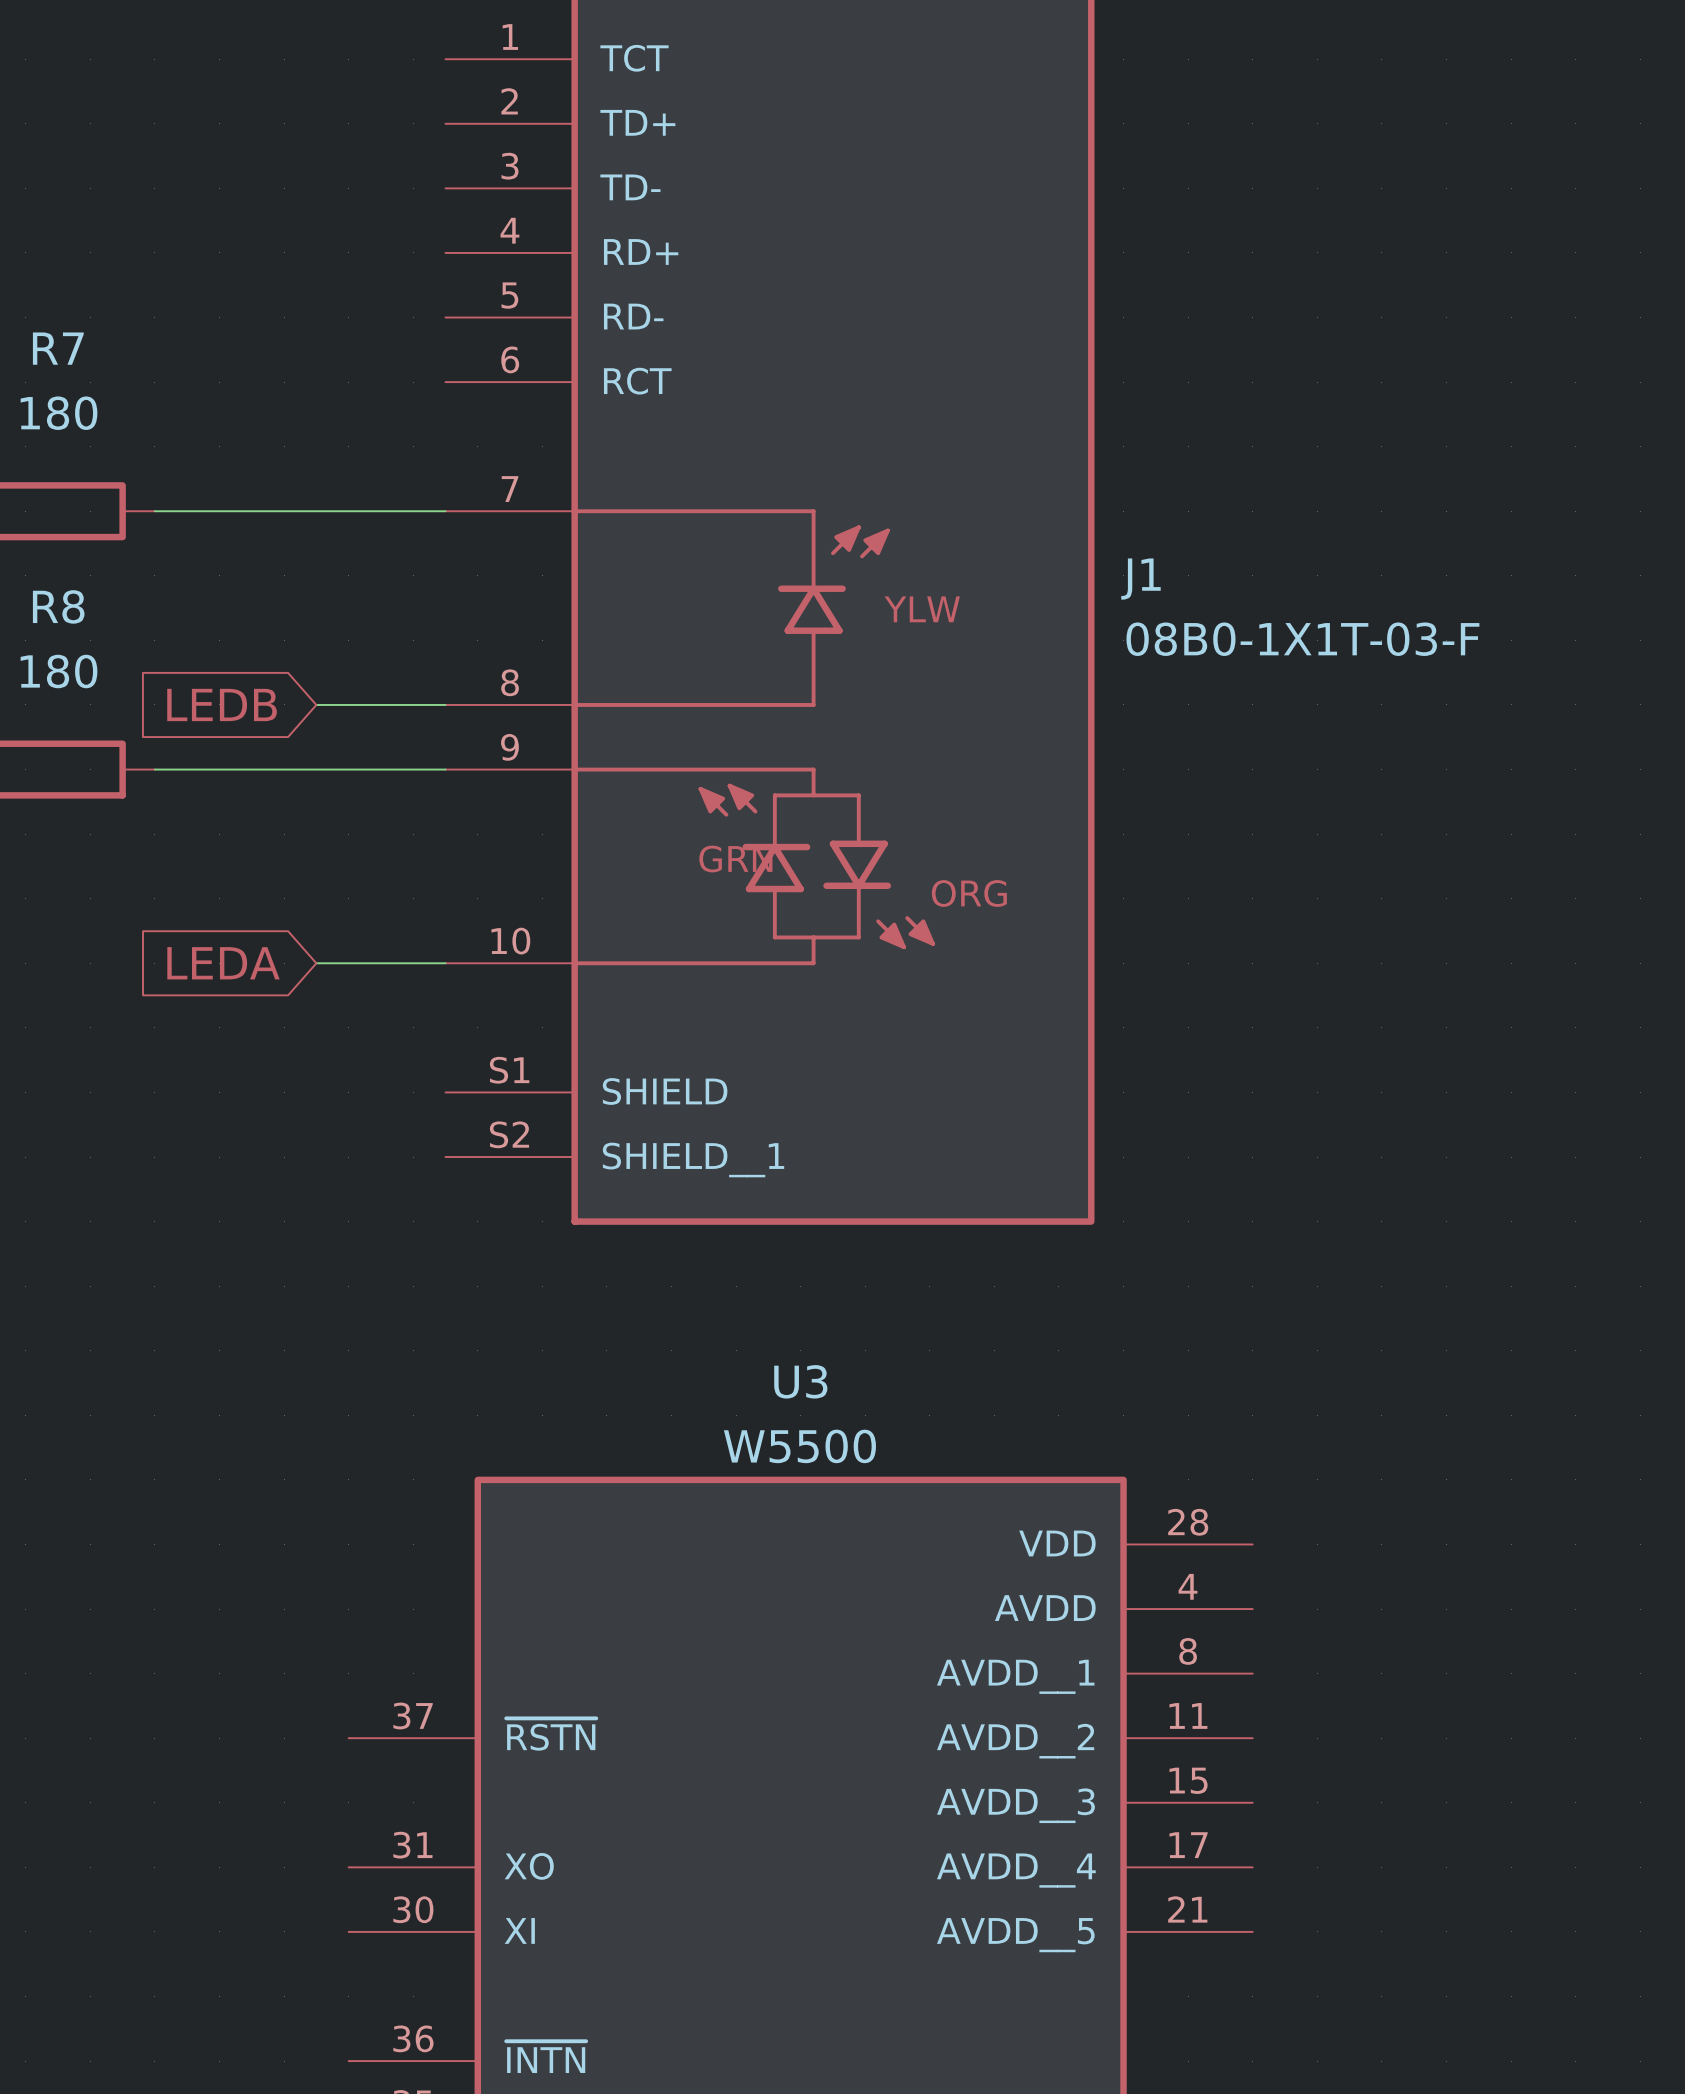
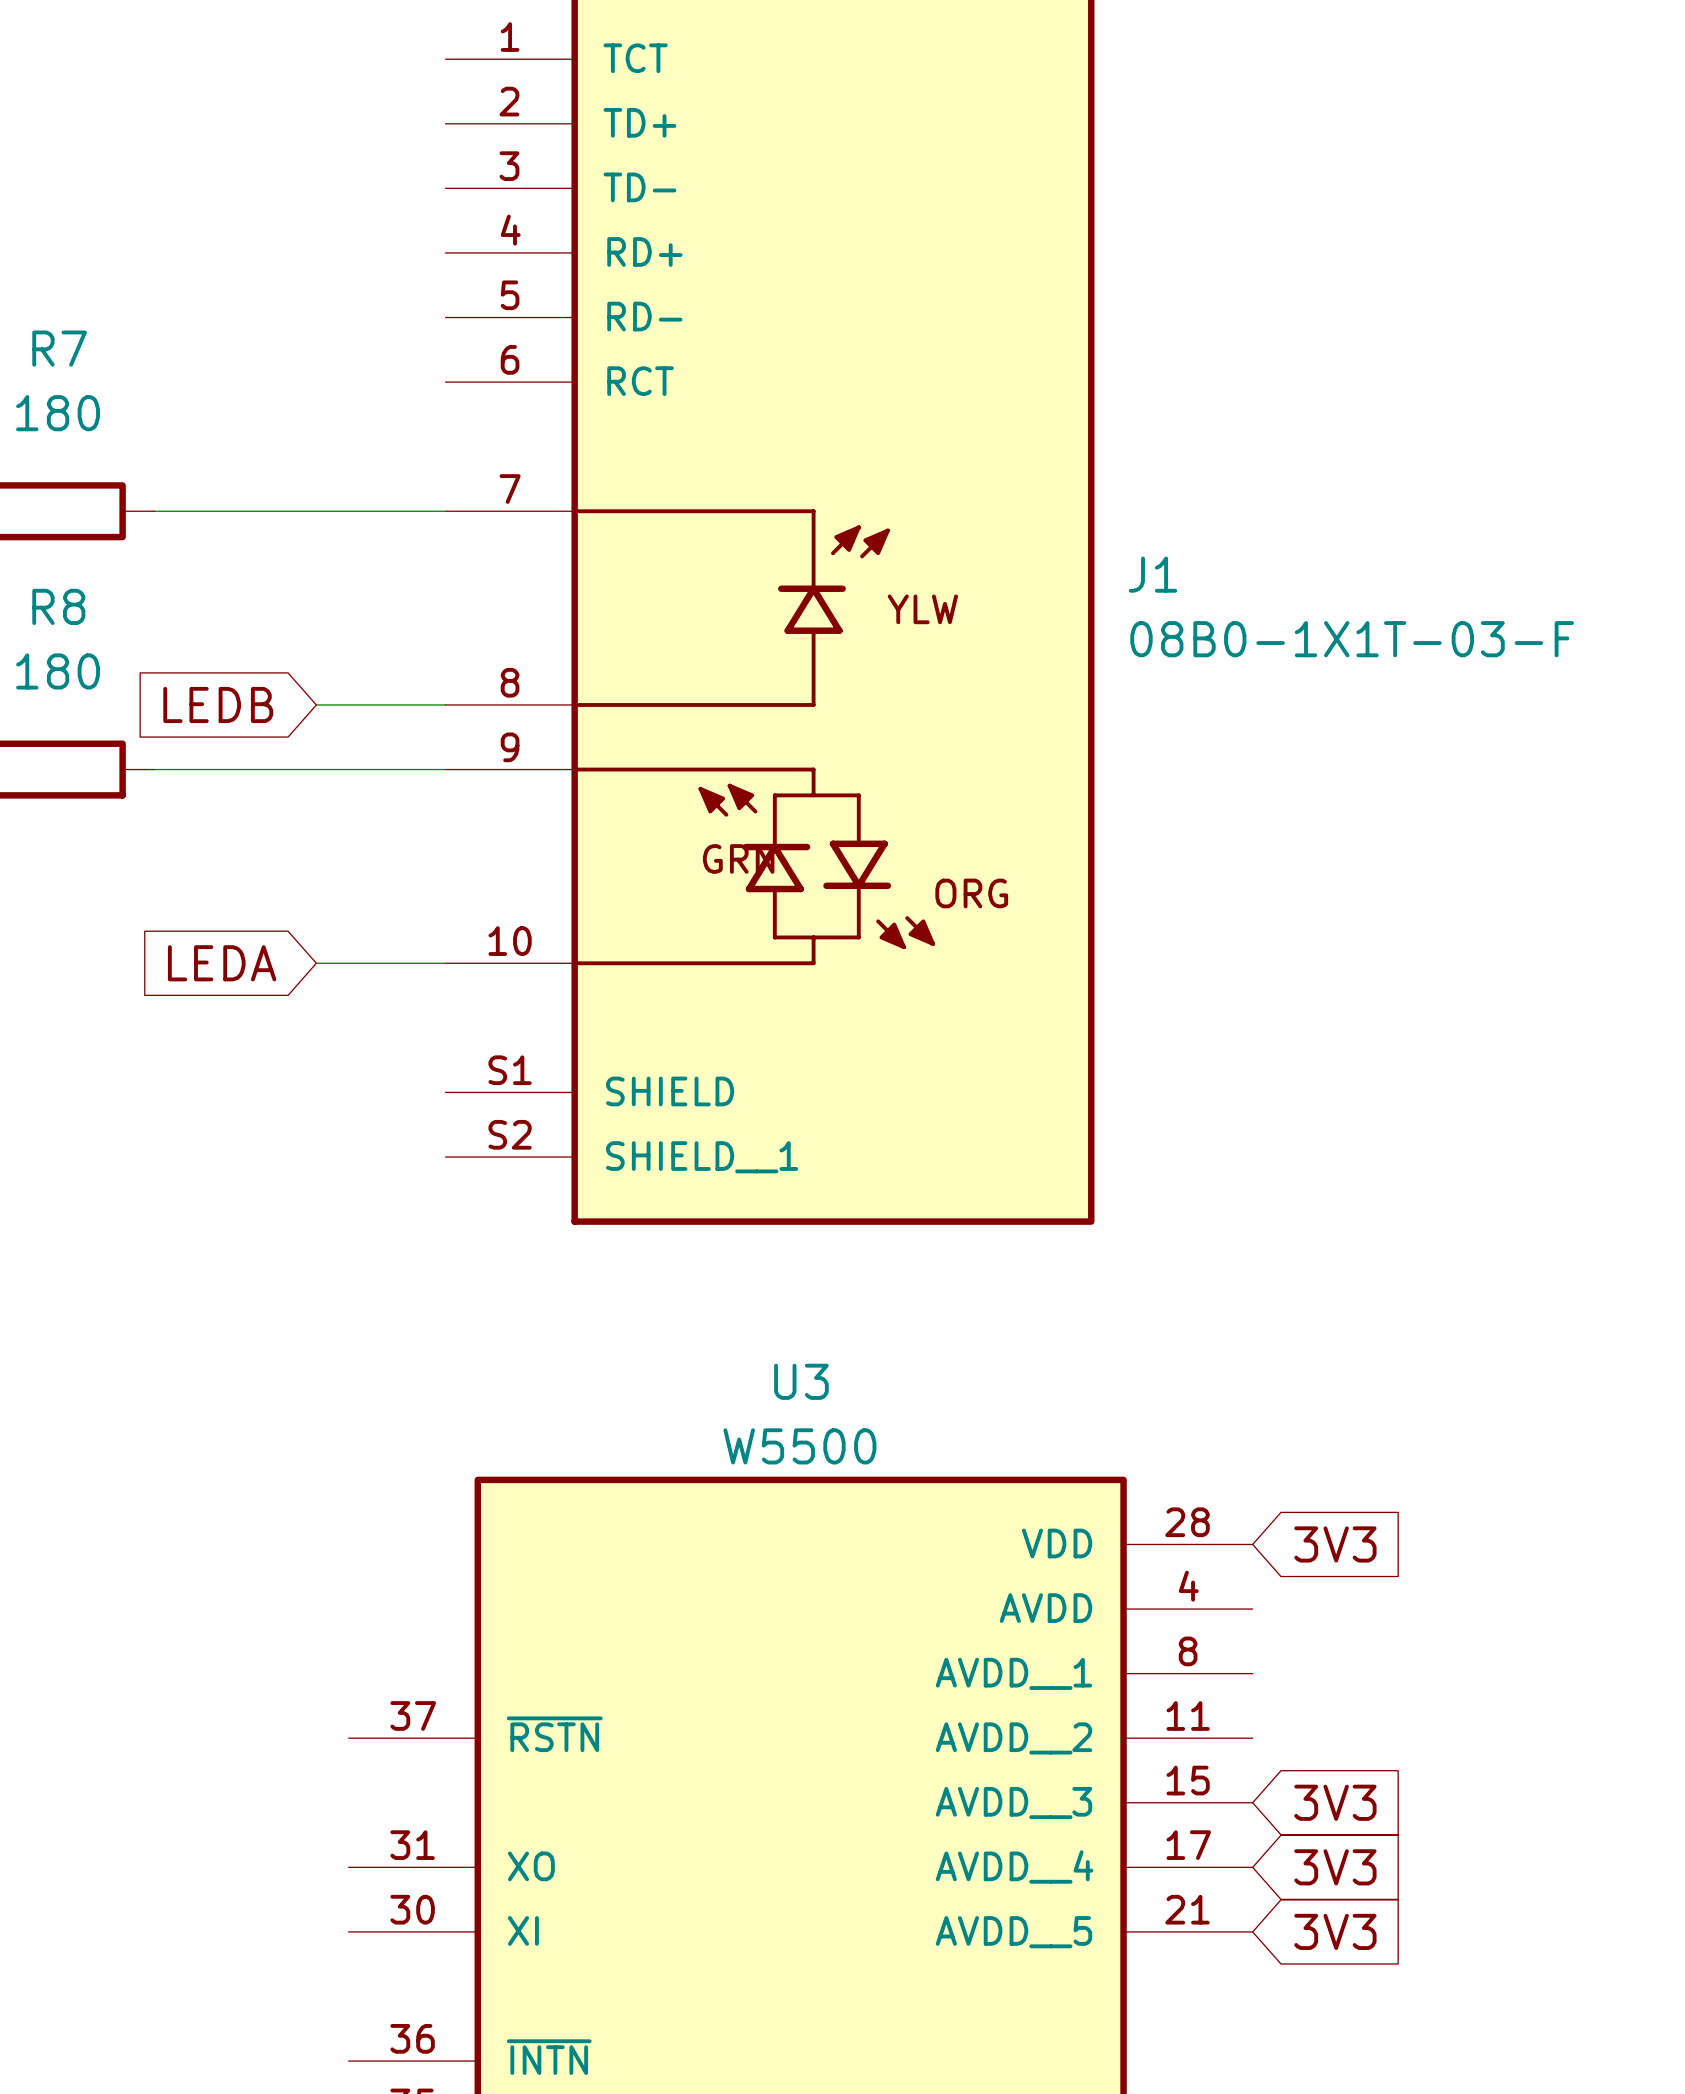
global label: none -> 3V3 (1335, 1544)
global label: none -> 3V3 (1335, 1802)
global label: none -> 3V3 (1335, 1867)
global label: none -> 3V3 (1335, 1931)

